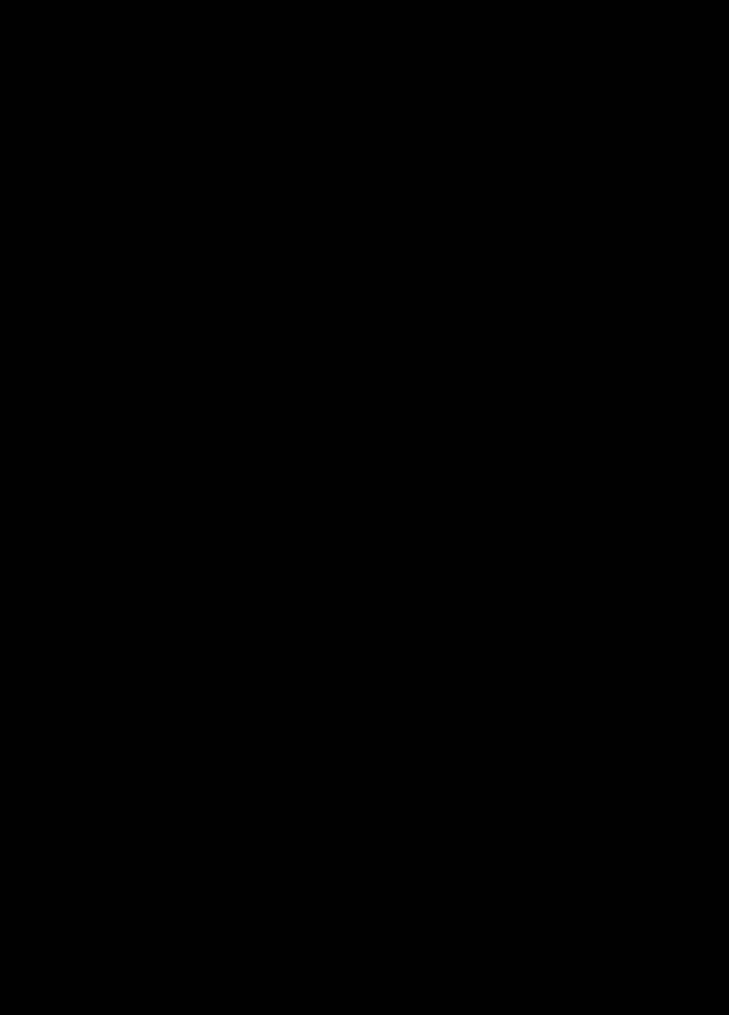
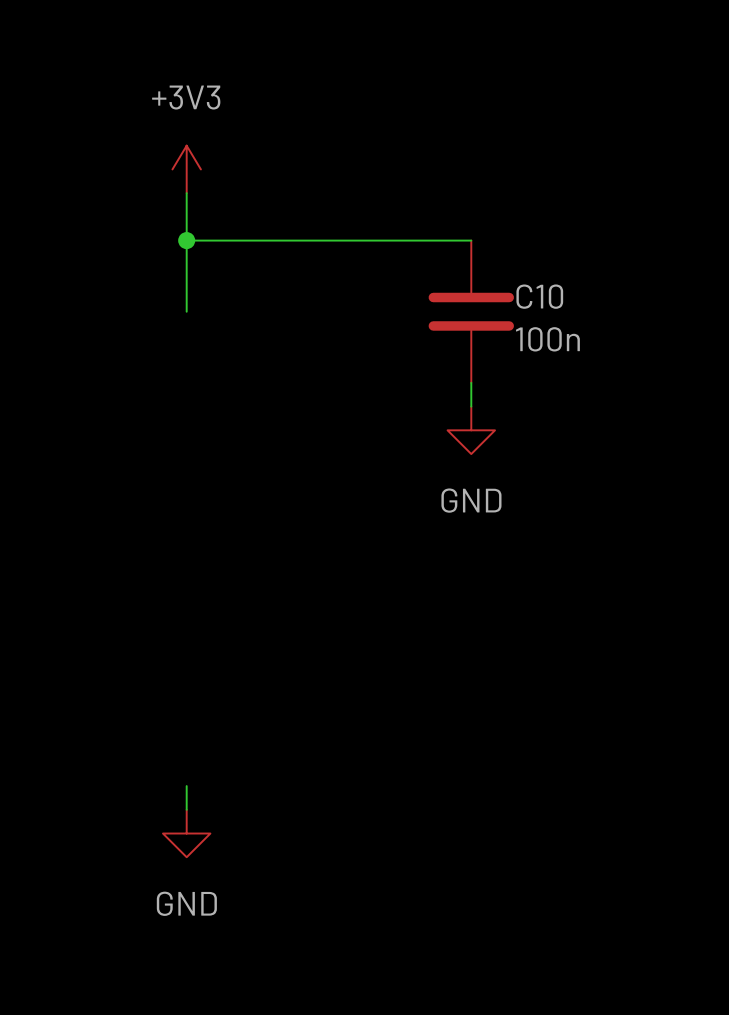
power symbol: none -> +3V3 (186, 169)
wire: none -> (186, 193) (186, 311)
wire: none -> (186, 240) (471, 240)
junction: none -> (186, 240)
C10: none -> 100n (471, 311)
wire: none -> (471, 382) (471, 406)
power symbol: none -> GND (471, 430)
wire: none -> (186, 786) (186, 809)
power symbol: none -> GND (186, 833)

